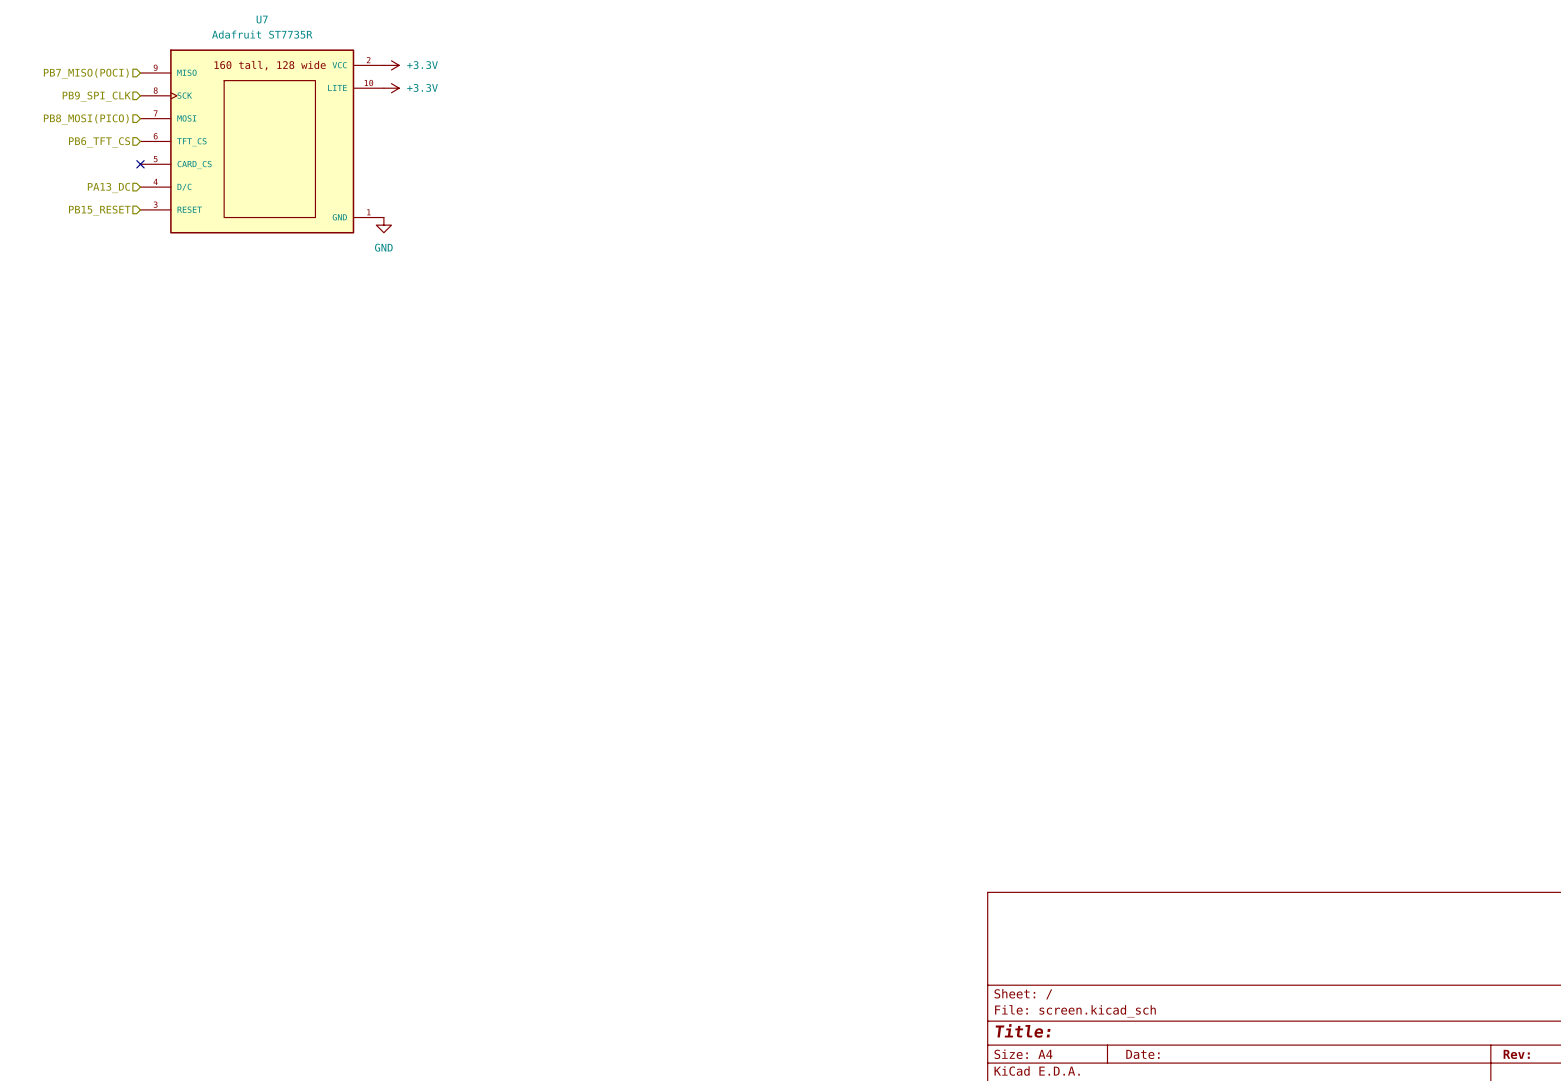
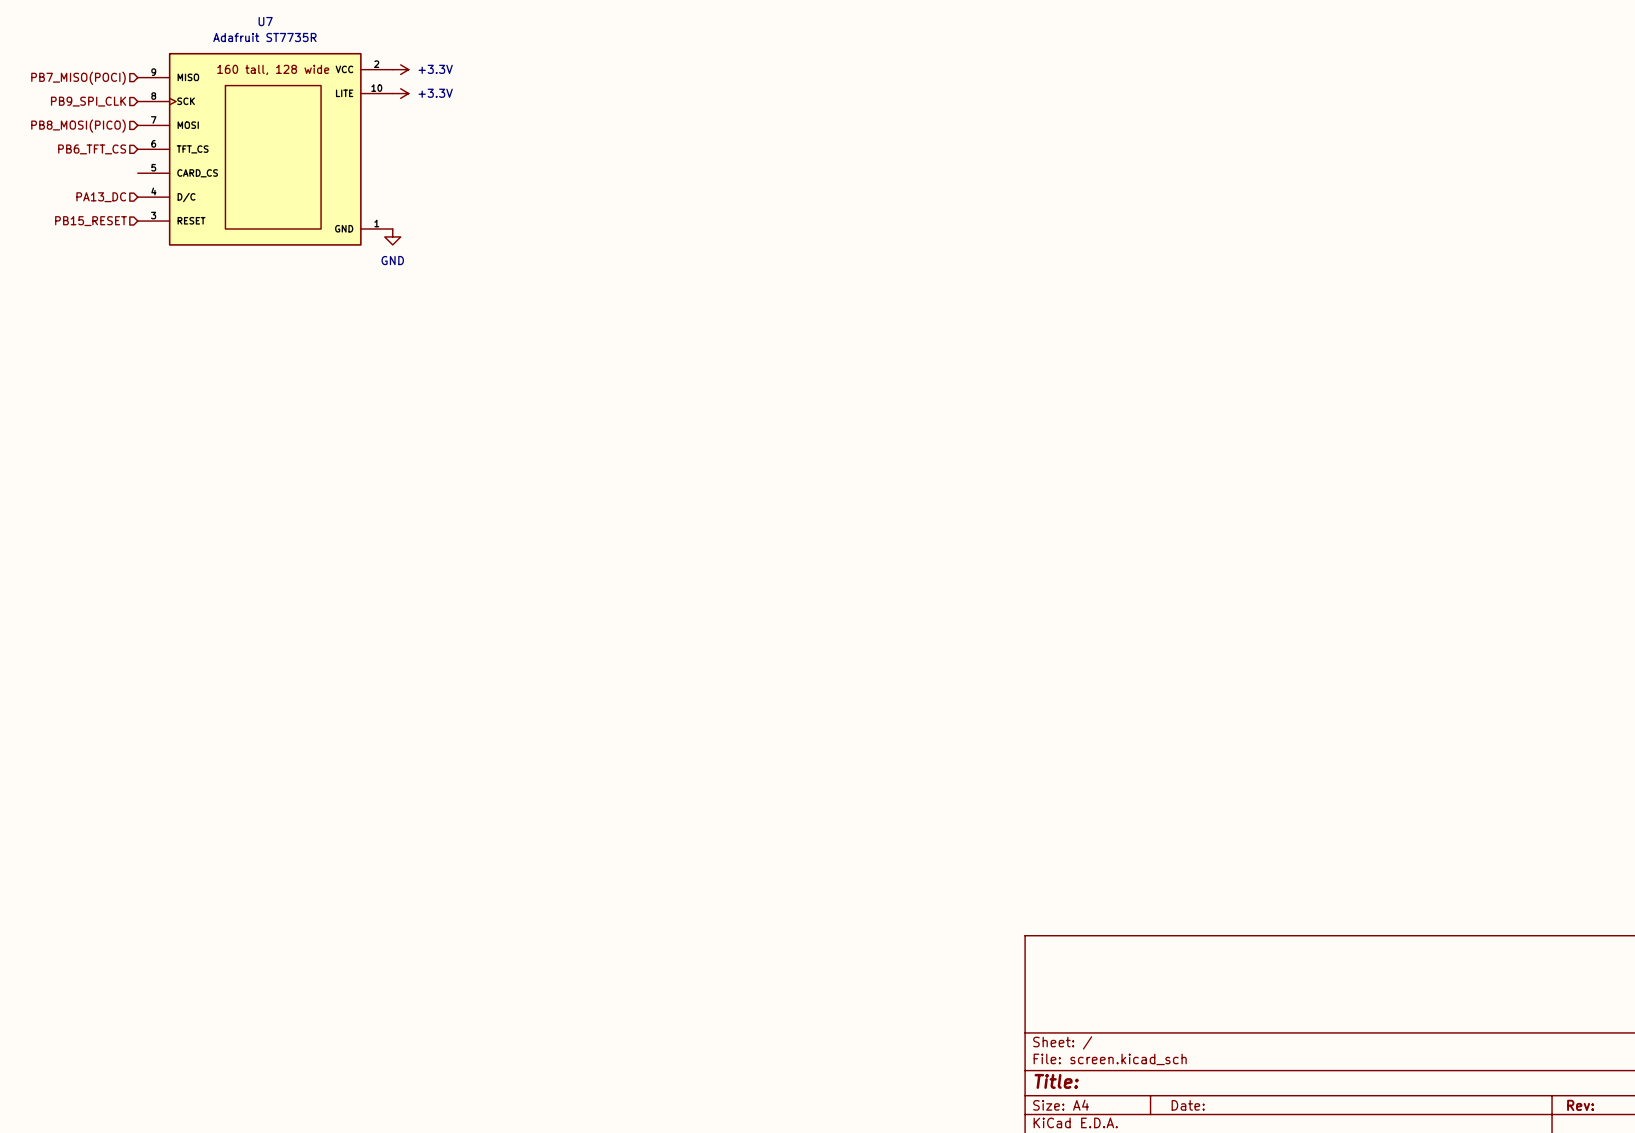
no-connect mark: (140, 164) -> none

